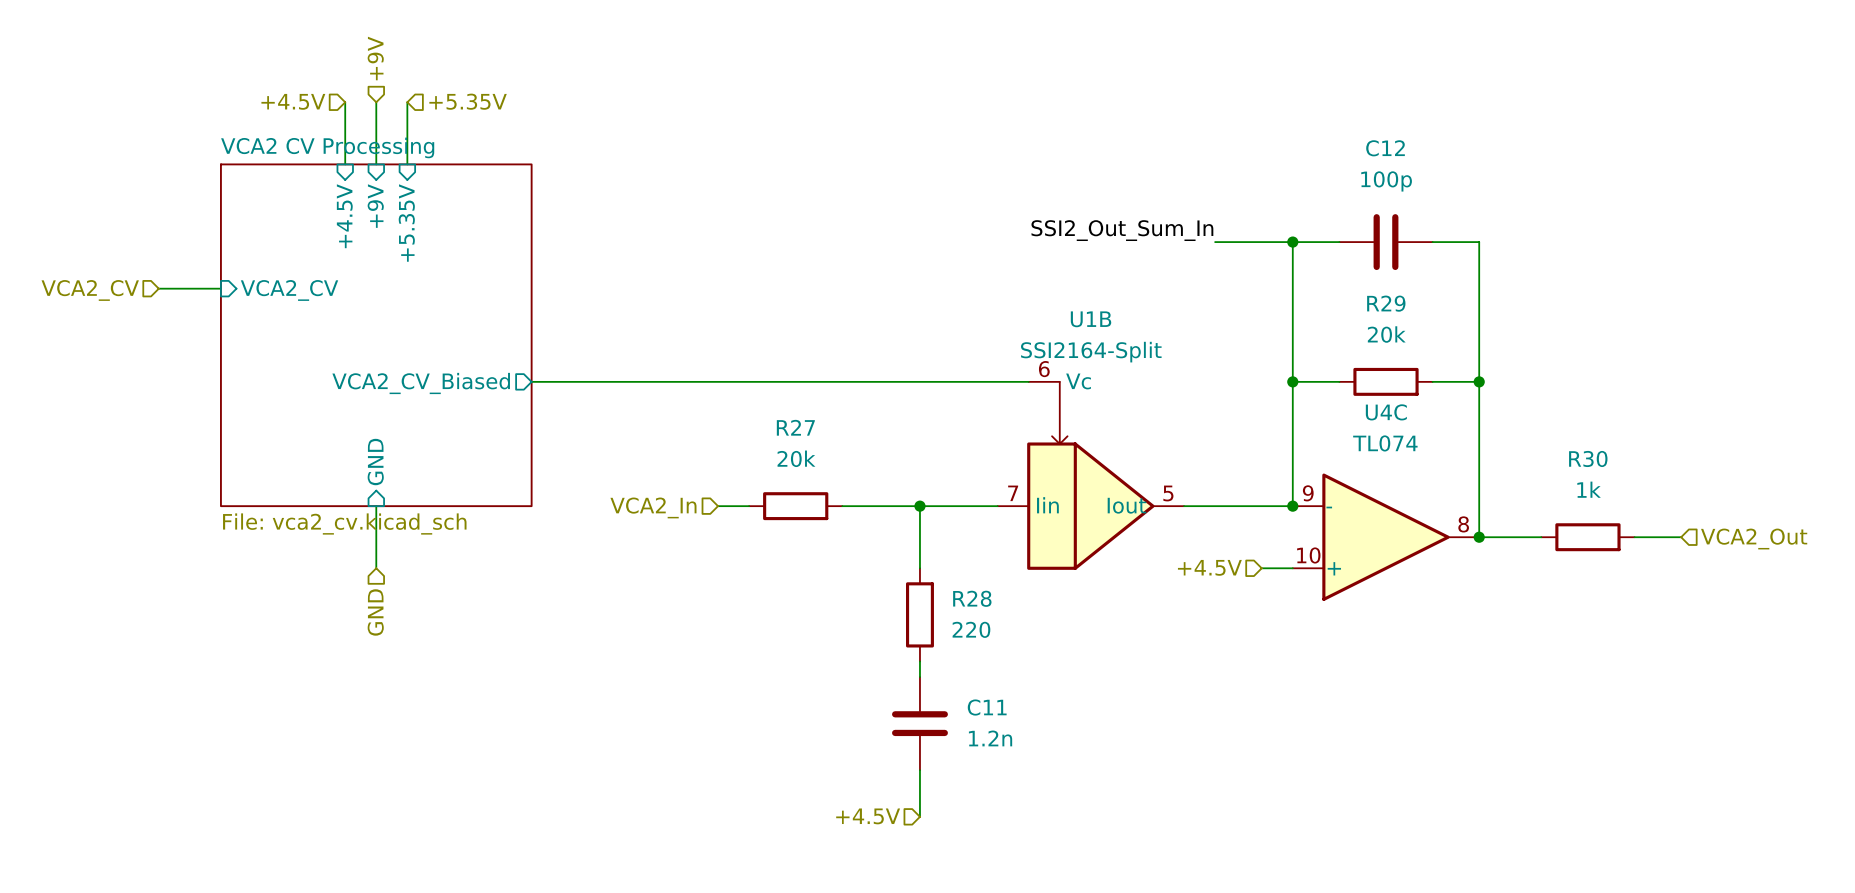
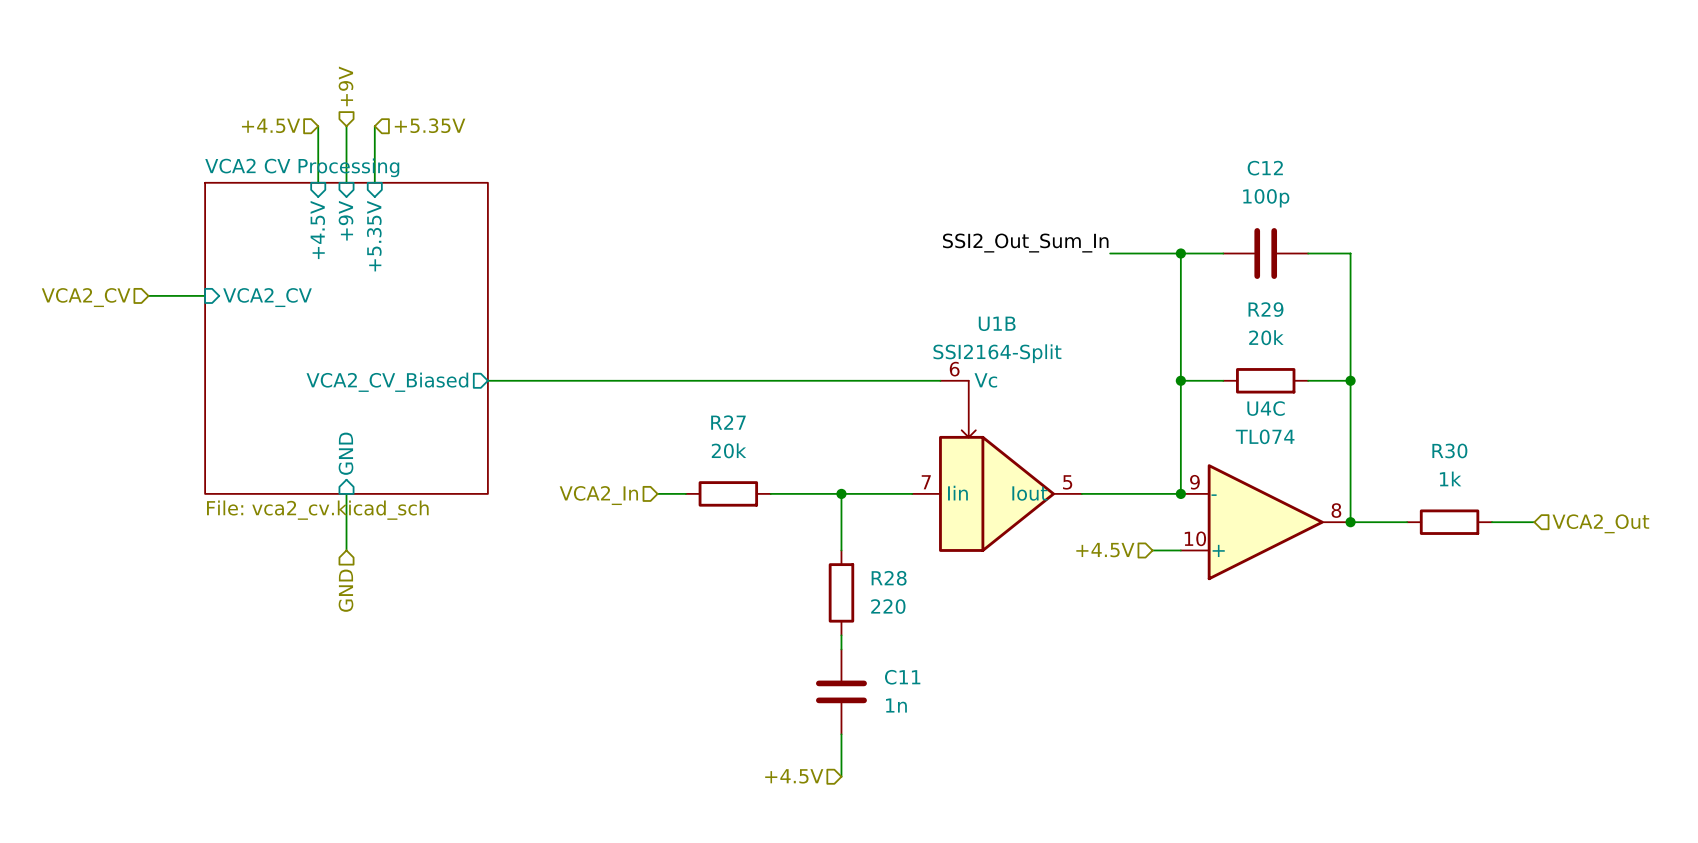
C11 value: 1.2n (990, 738) -> 1n (896, 705)

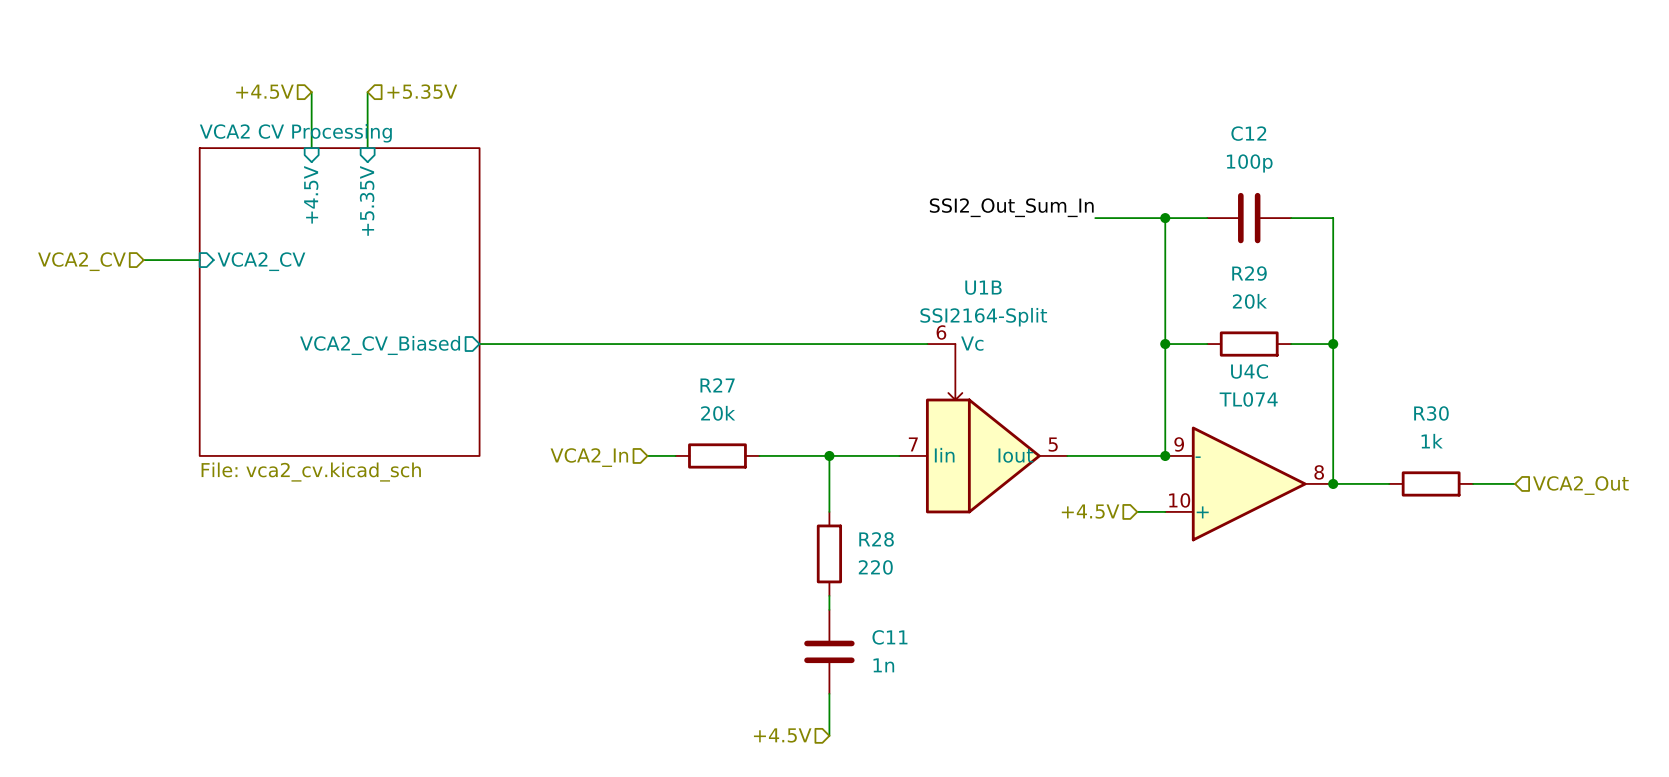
hierarchical label: +9V (345, 86) -> none
wire: (346, 126) (346, 182) -> none
sheet pin: +9V (345, 220) -> none
sheet pin: GND (345, 453) -> none
wire: (346, 493) (346, 550) -> none
hierarchical label: GND (345, 590) -> none

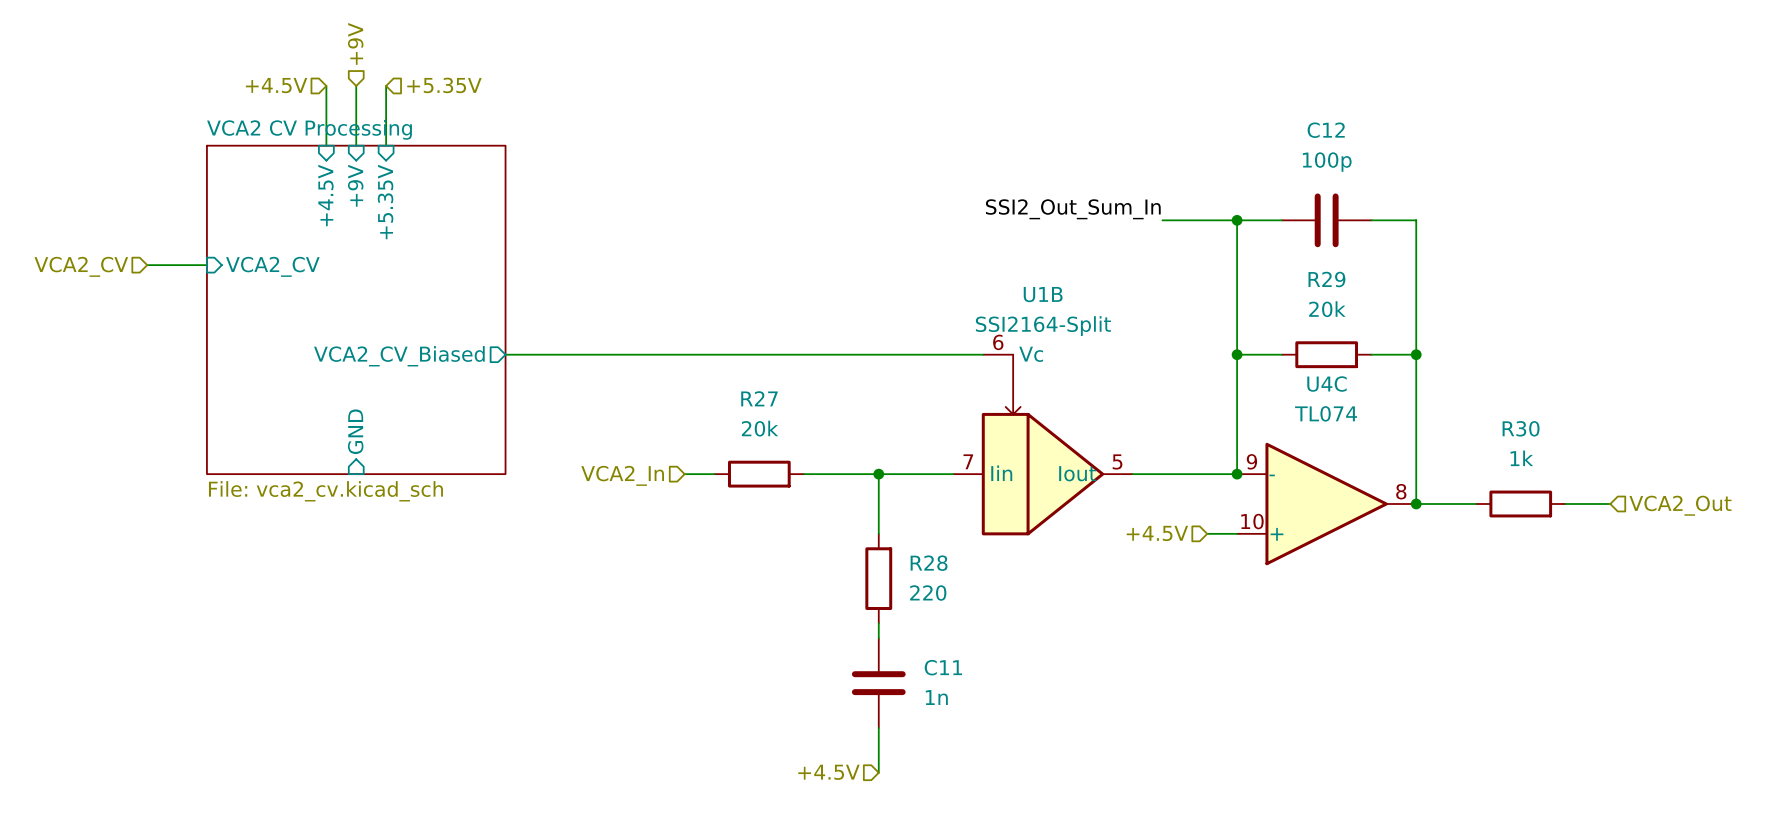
hierarchical label: none -> +9V (355, 43)
wire: none -> (356, 85) (356, 145)
sheet pin: none -> +9V (355, 185)
sheet pin: none -> GND (355, 431)

